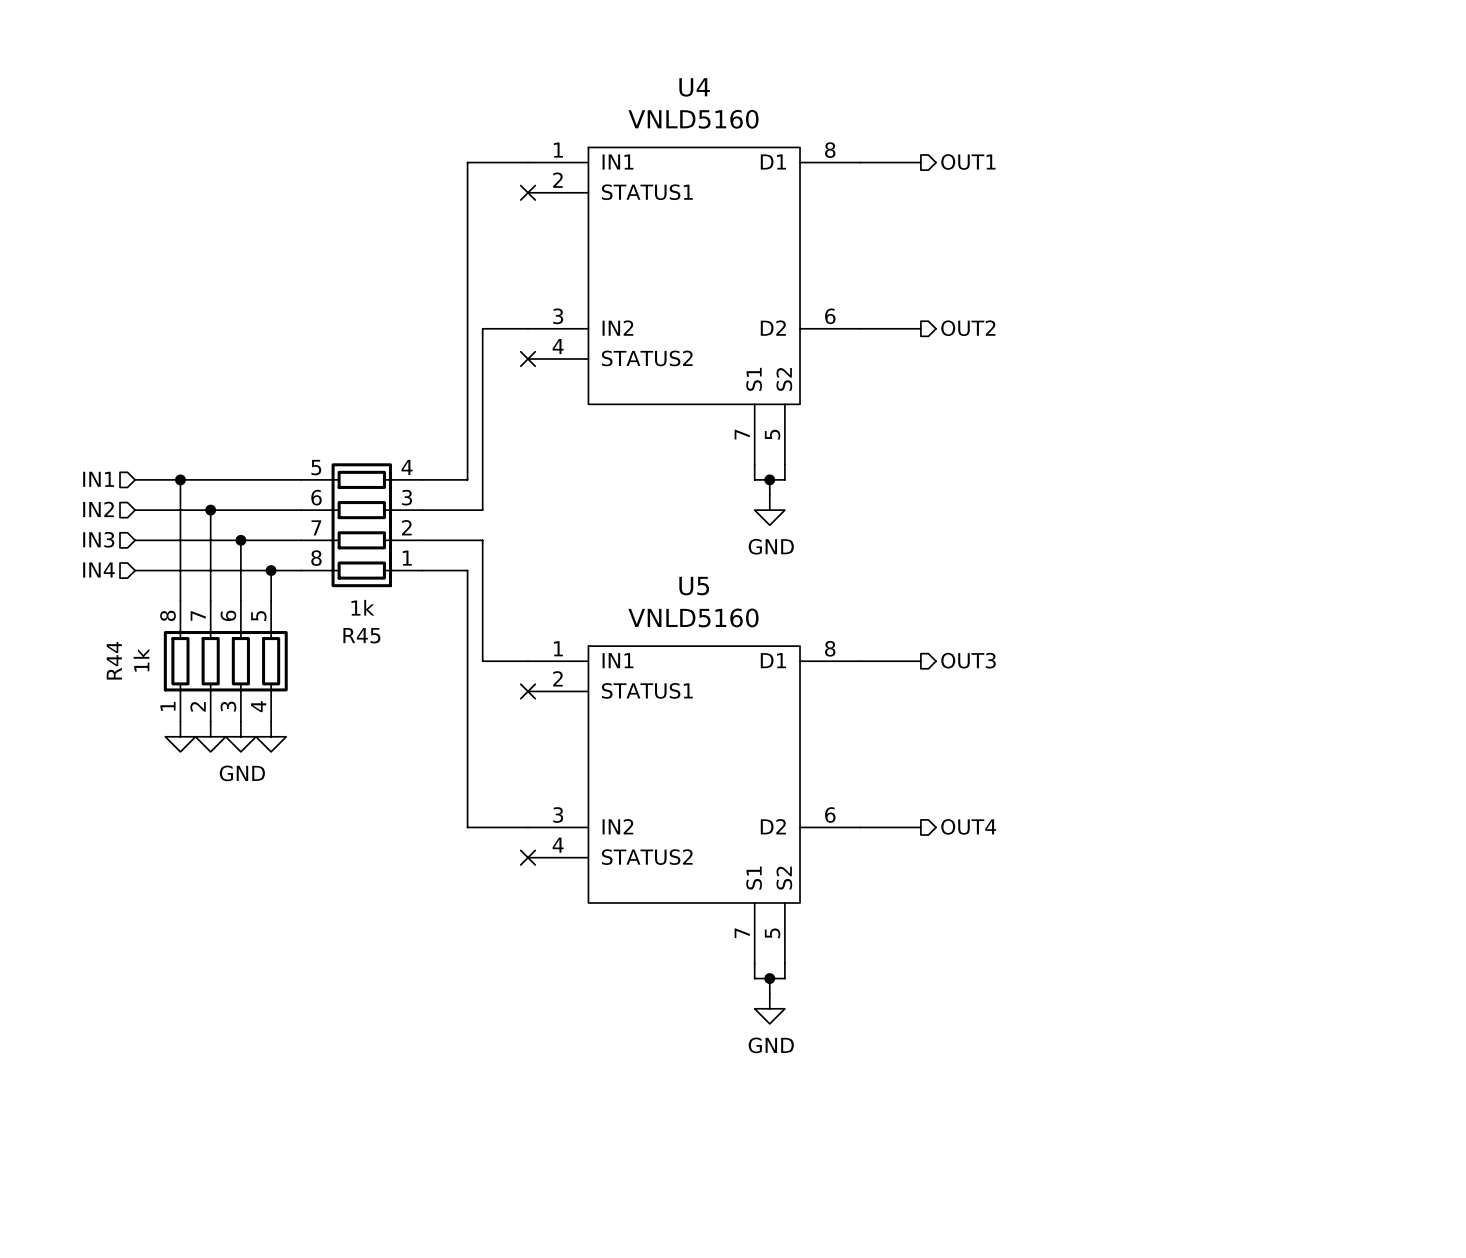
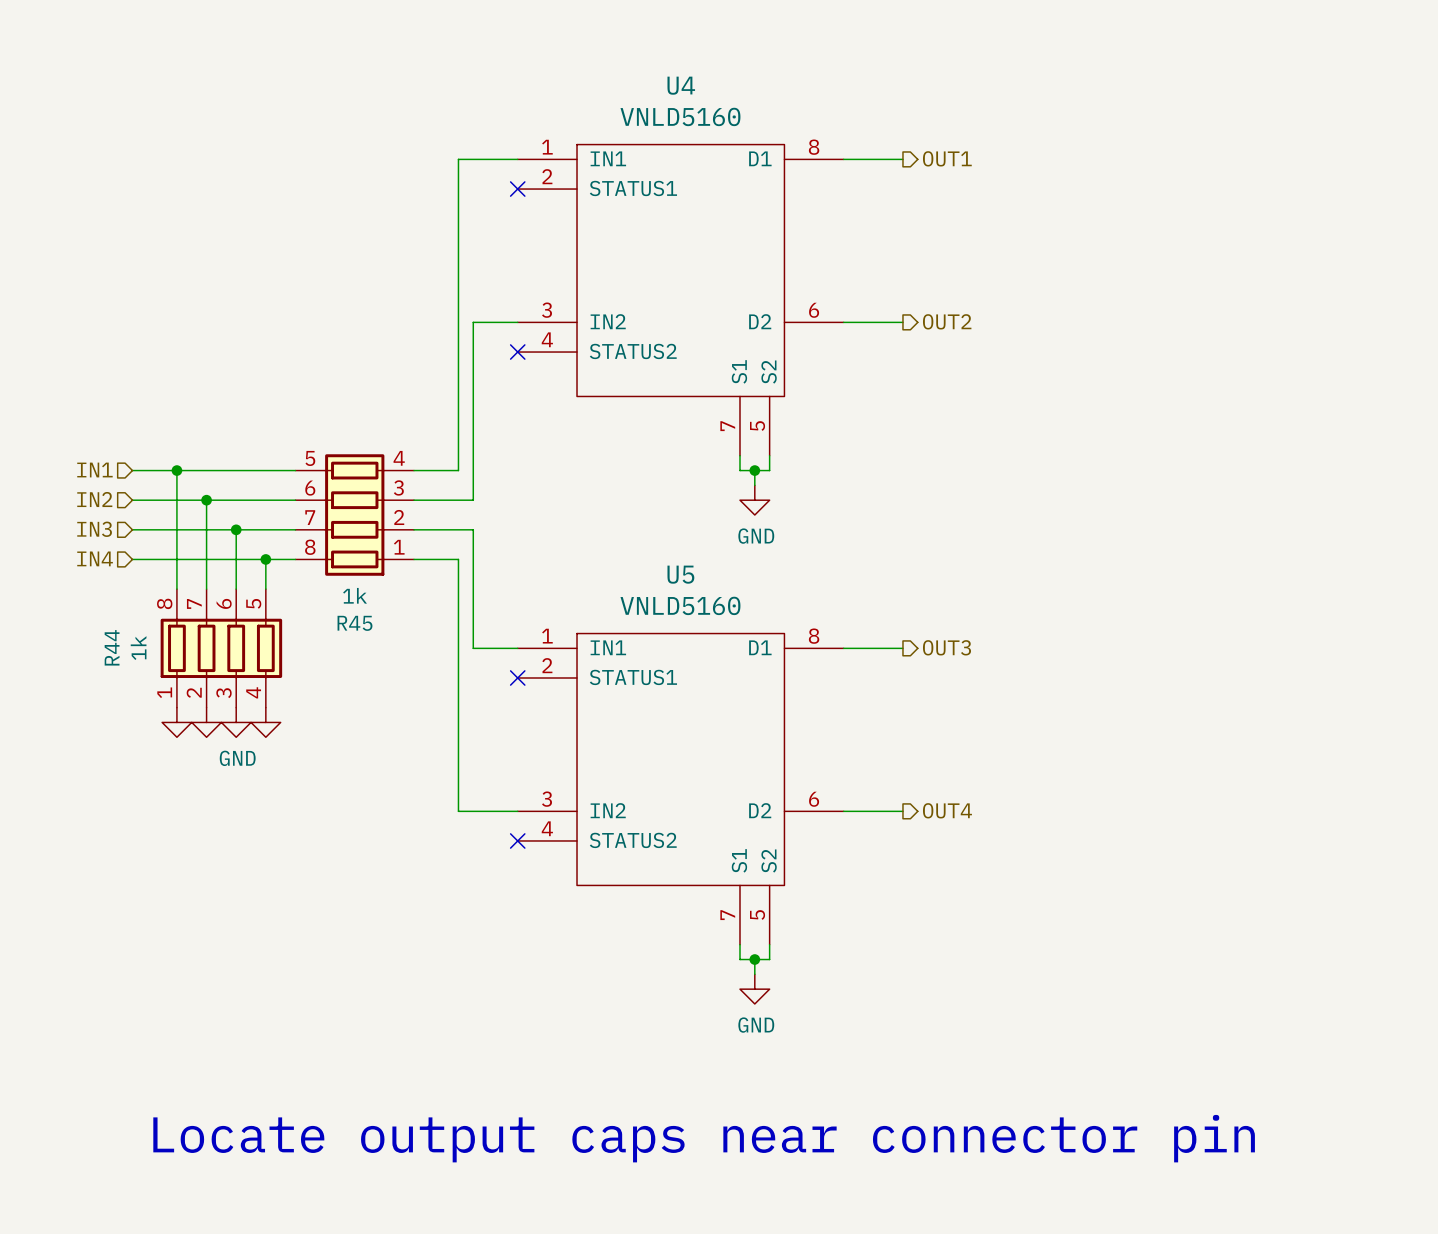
text: none -> Locate output caps near connector pin (704, 1138)

